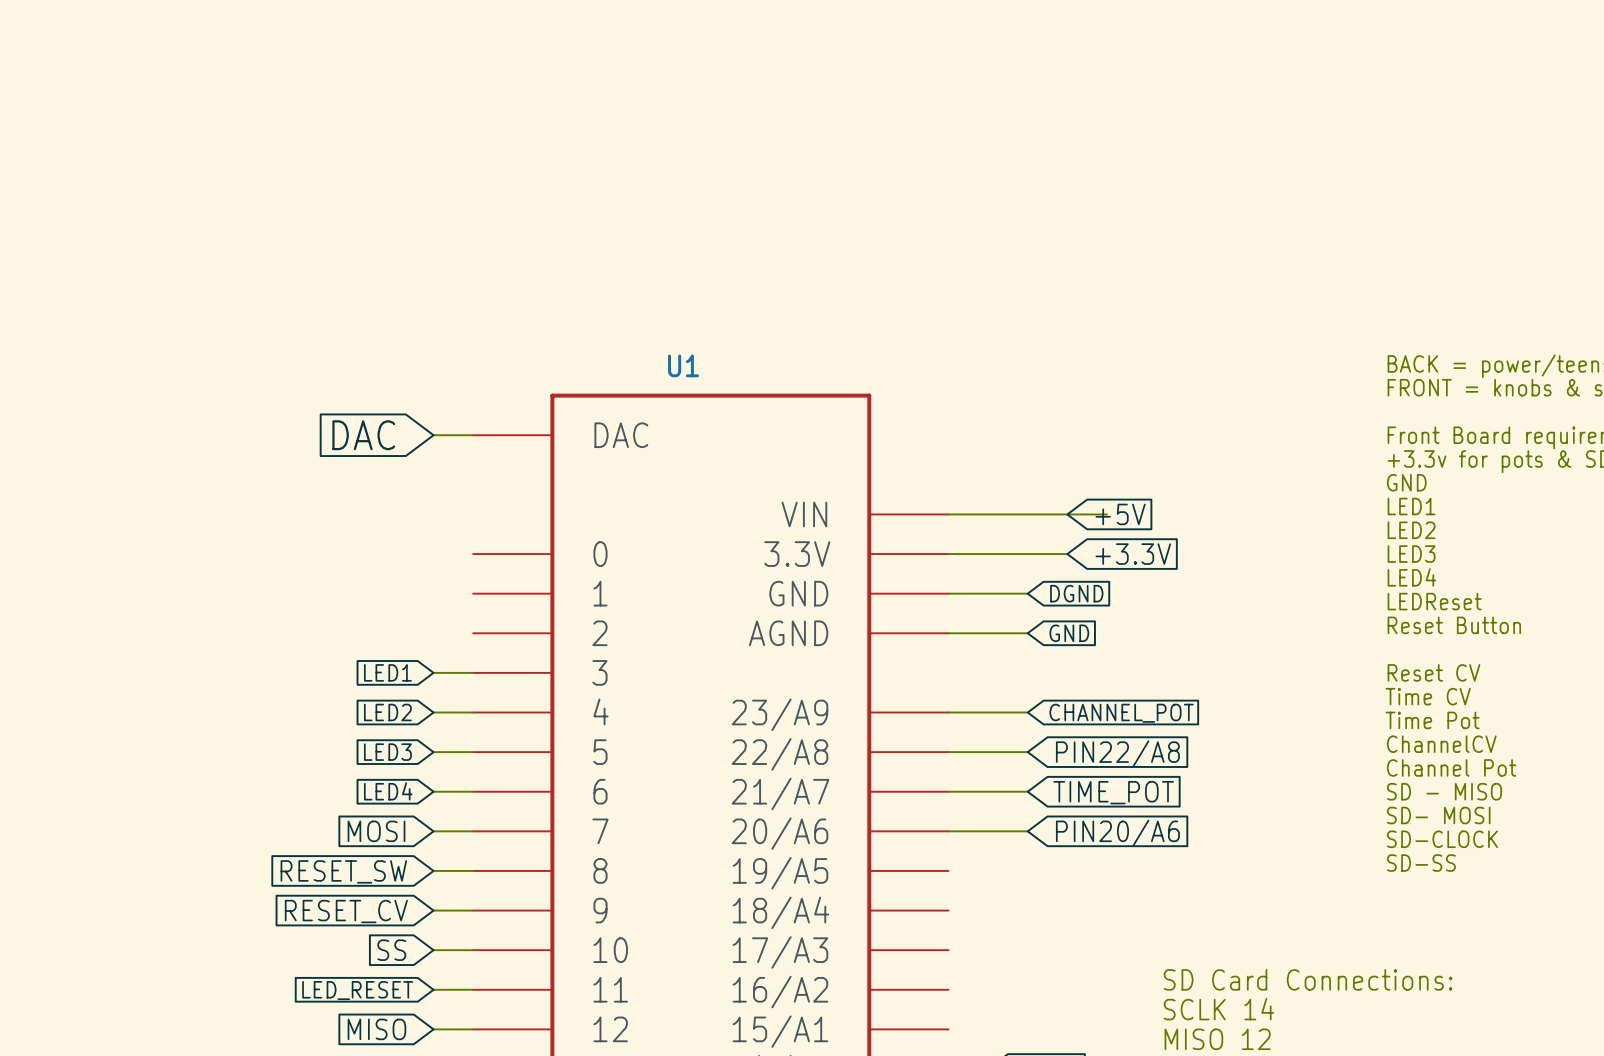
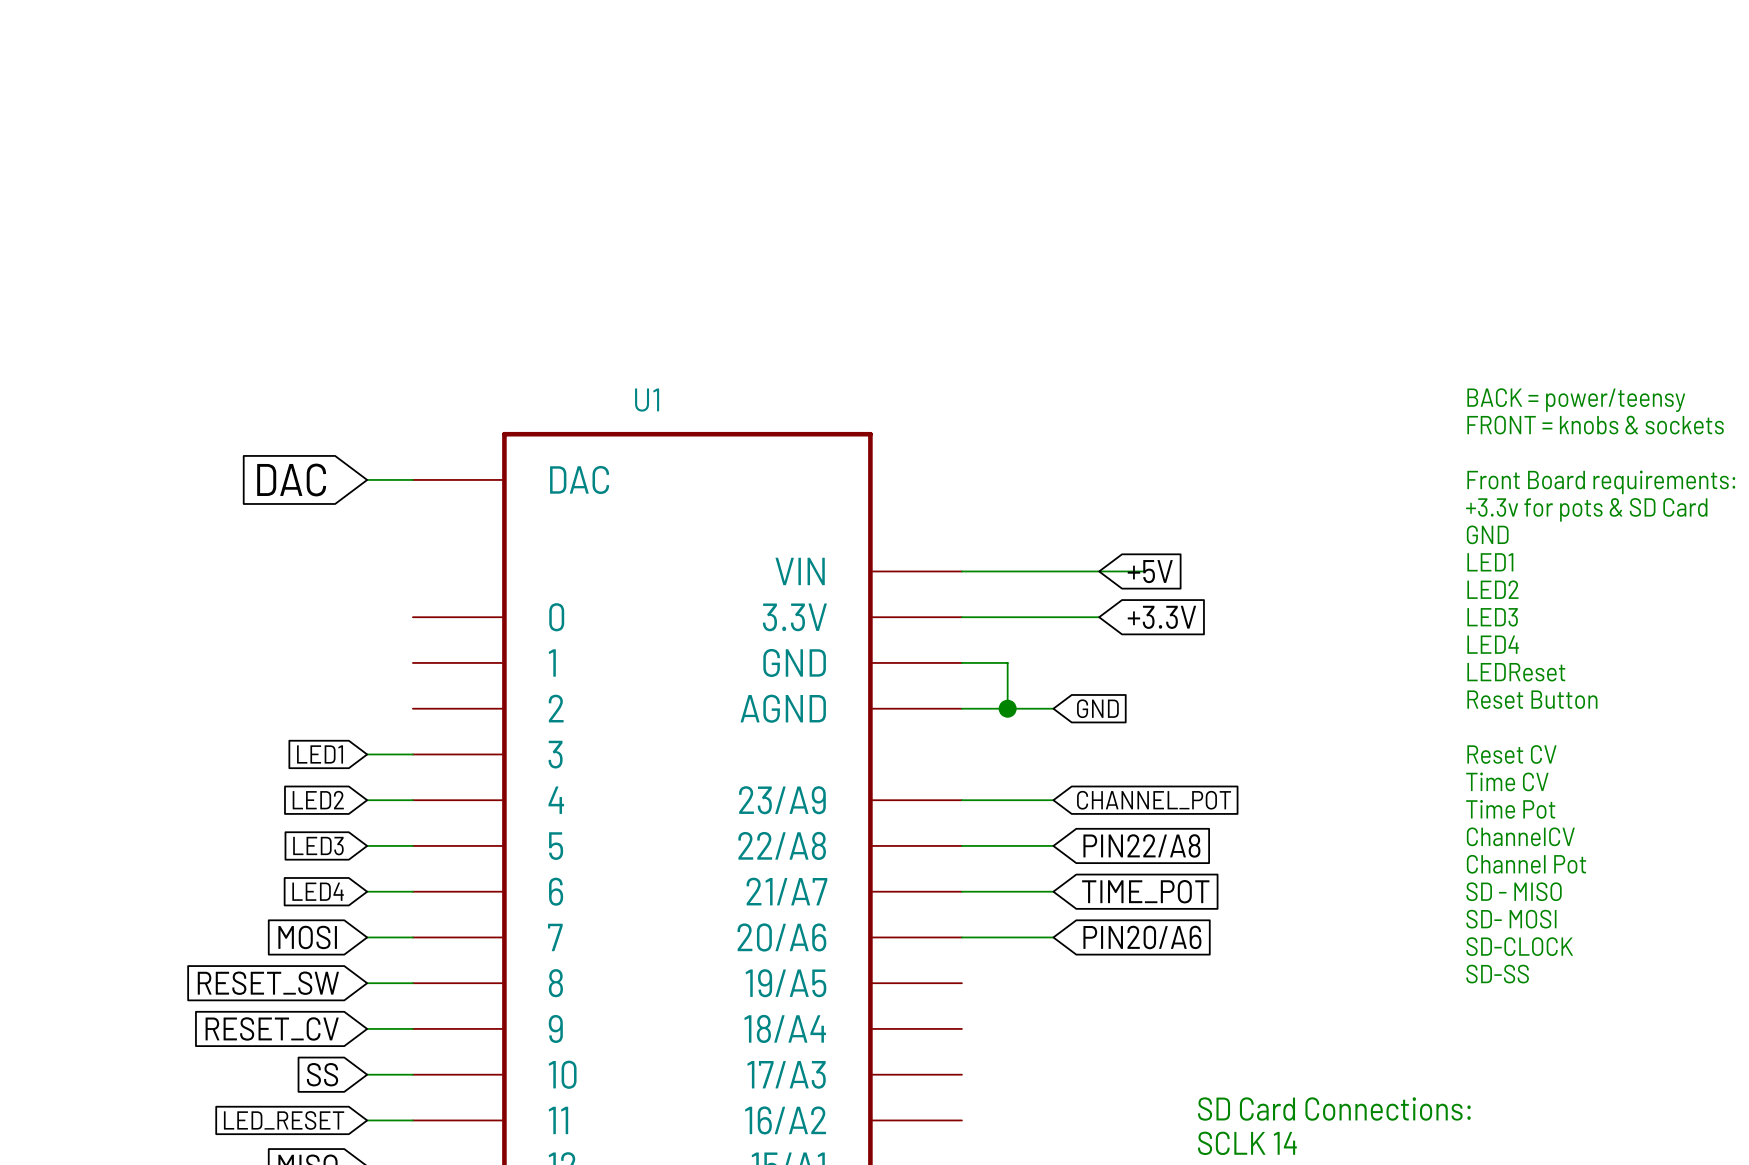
wire: (988, 593) (1027, 593) -> (1007, 662) (1007, 708)
global label: DGND (1076, 593) -> none
junction: none -> (1007, 708)

